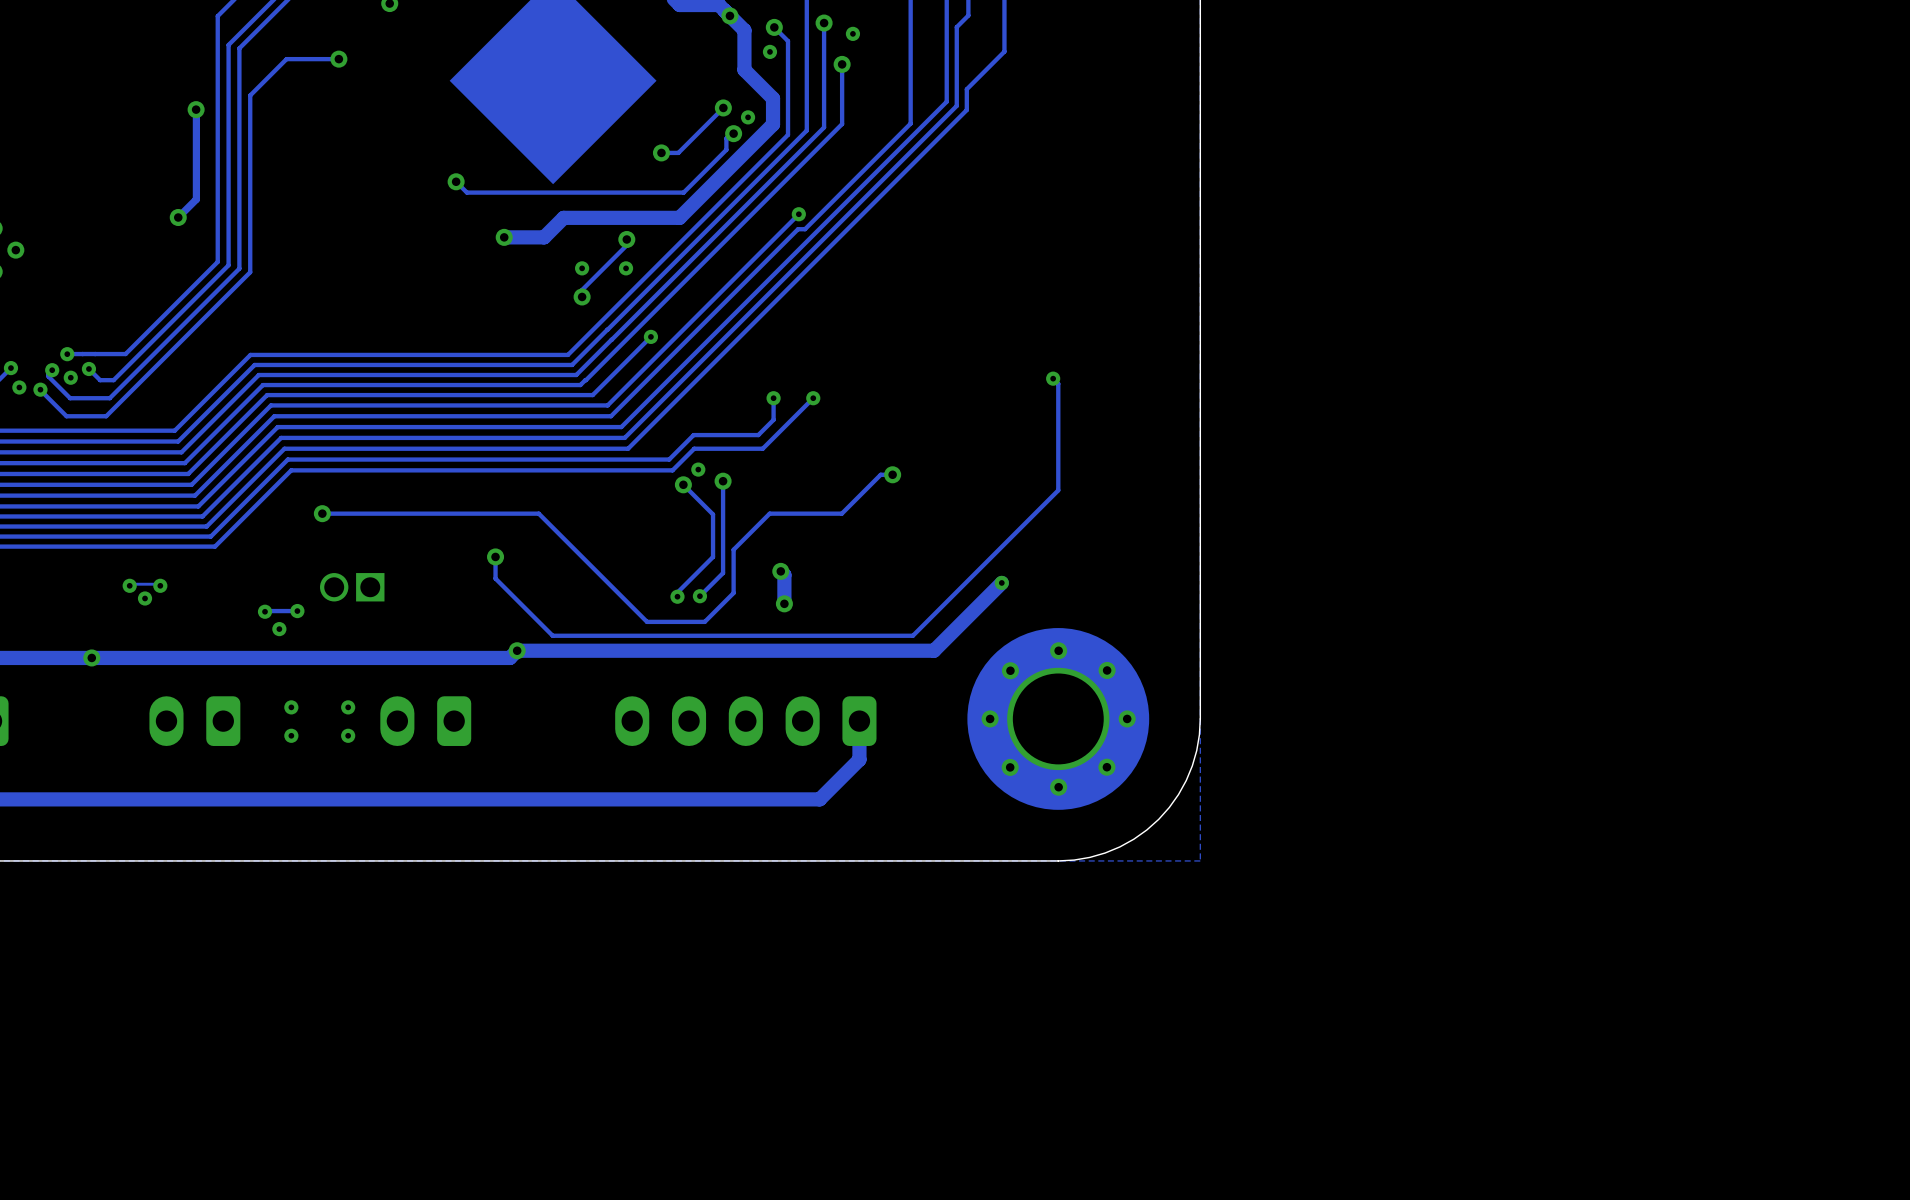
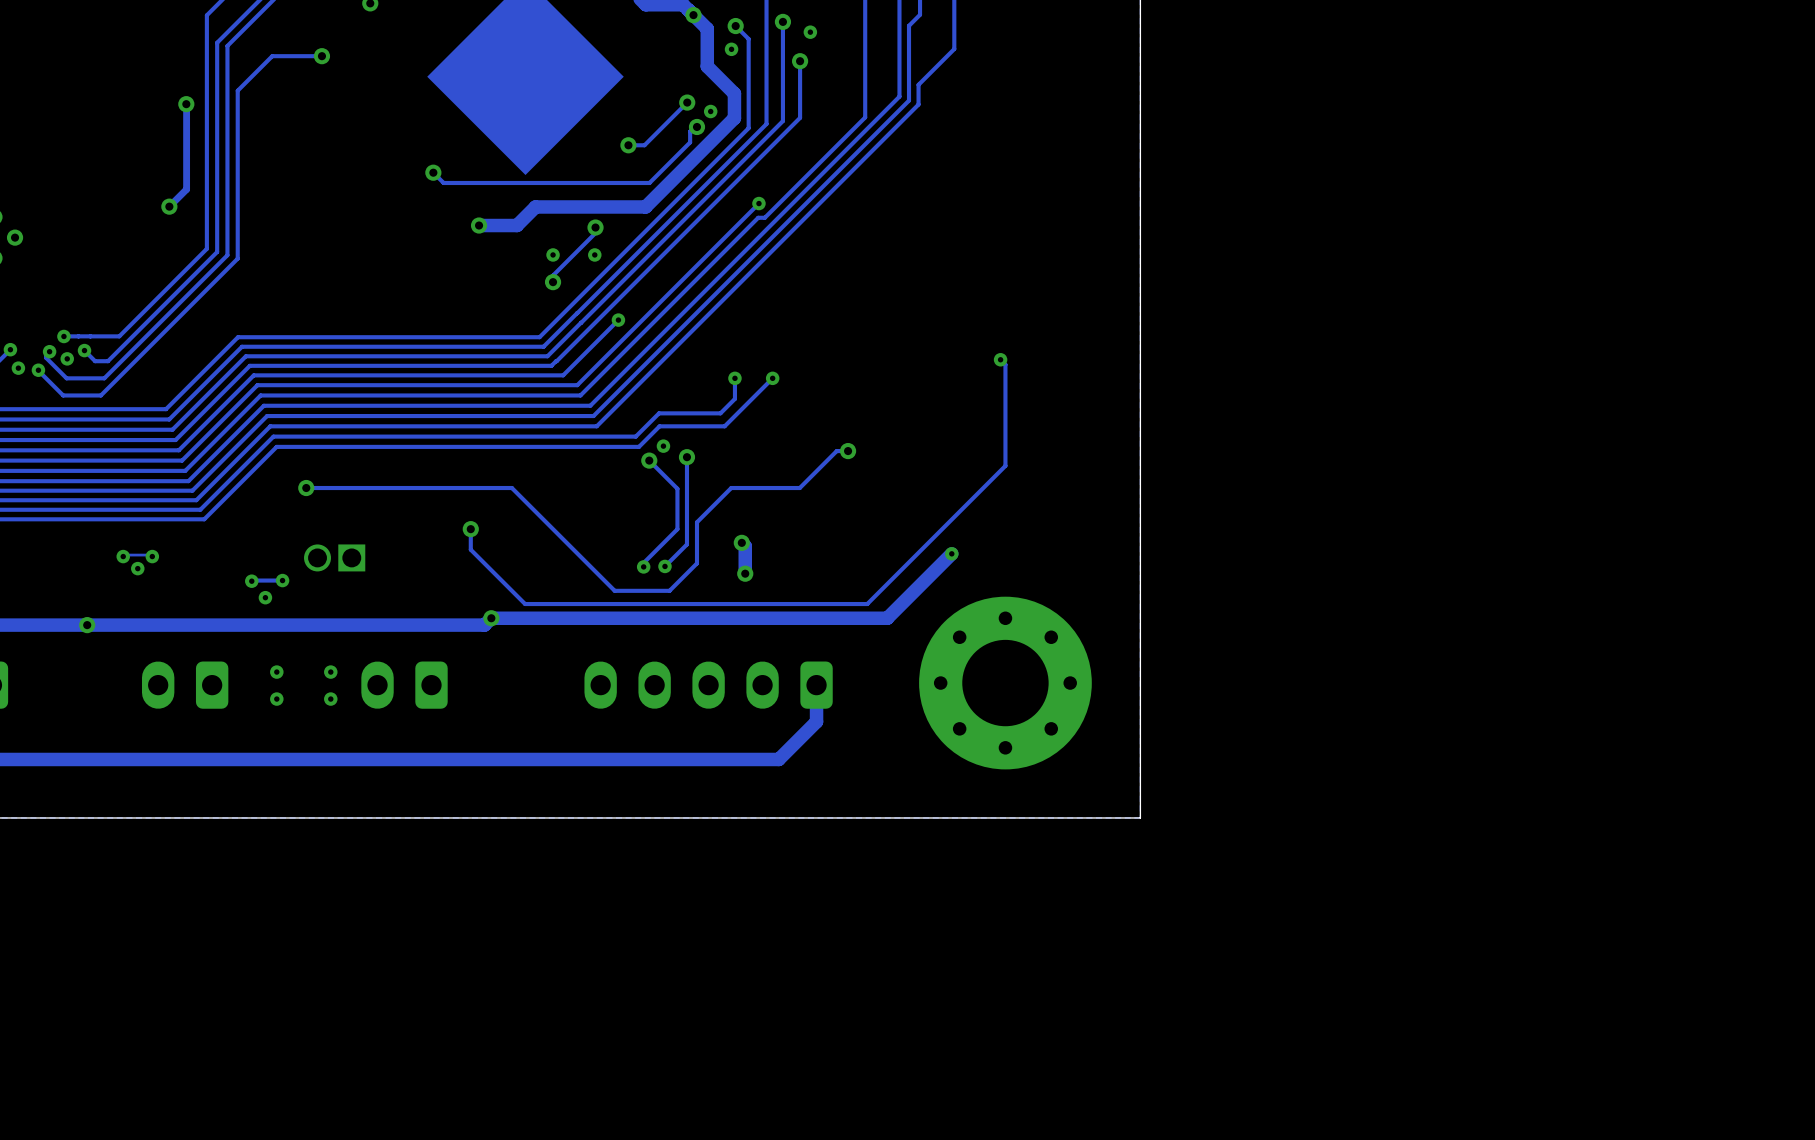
part footprint: [967, 628, 1150, 810] -> [919, 596, 1092, 770]
via: (1058, 650) -> none
via: (1010, 670) -> none
via: (1107, 670) -> none
via: (990, 718) -> none
via: (1127, 718) -> none
board edge: (1200, 718) (1196, 750) (1186, 780) (1169, 807) (1158, 819) (1133, 839) (1105, 853) (1074, 860) (1058, 860) -> (1140, 683) (1140, 817) (1005, 817)
via: (1010, 767) -> none
via: (1106, 767) -> none
via: (1058, 787) -> none

